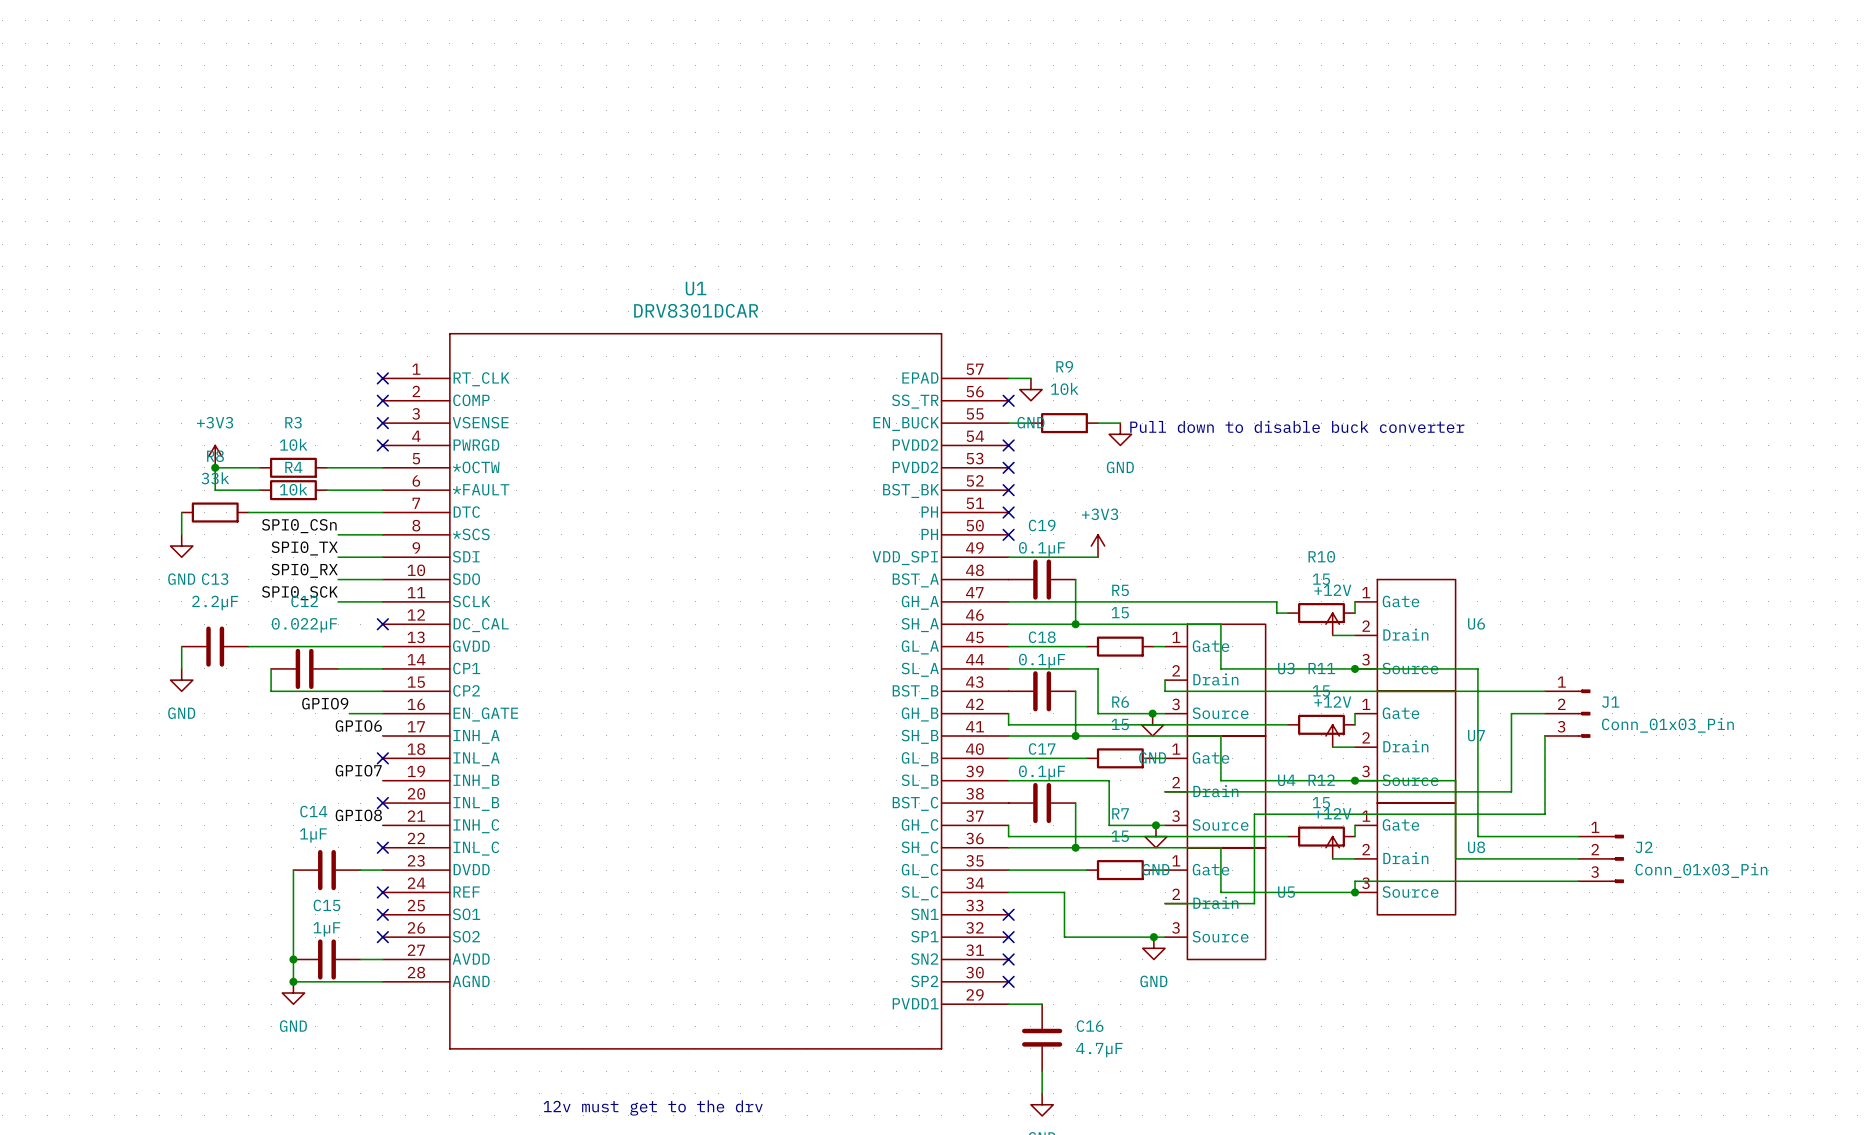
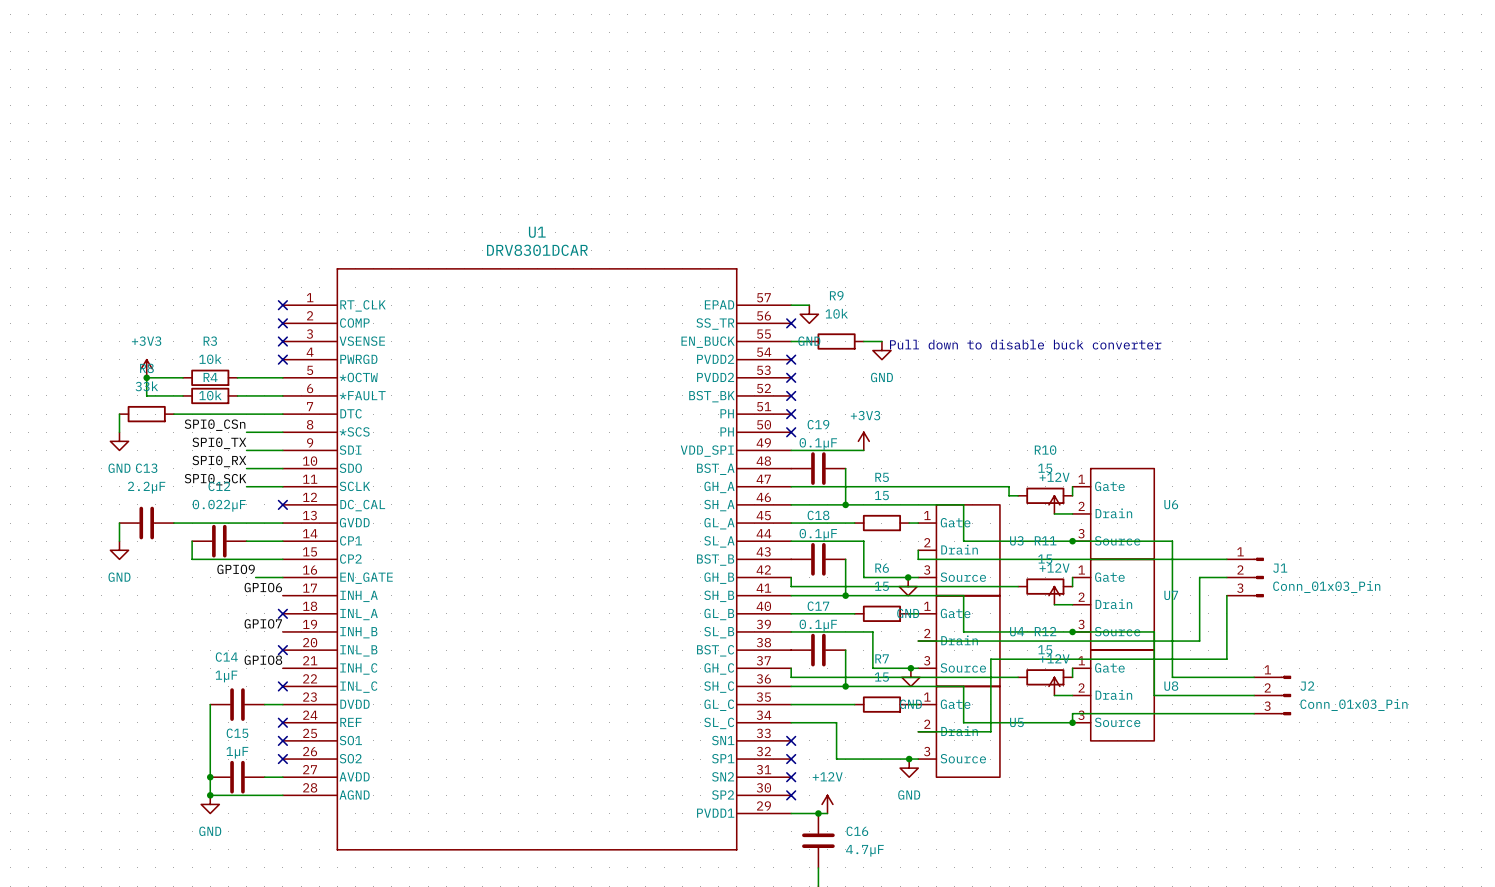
power symbol: none -> +12V (827, 804)
wire: none -> (818, 813) (827, 813)
junction: none -> (818, 813)

